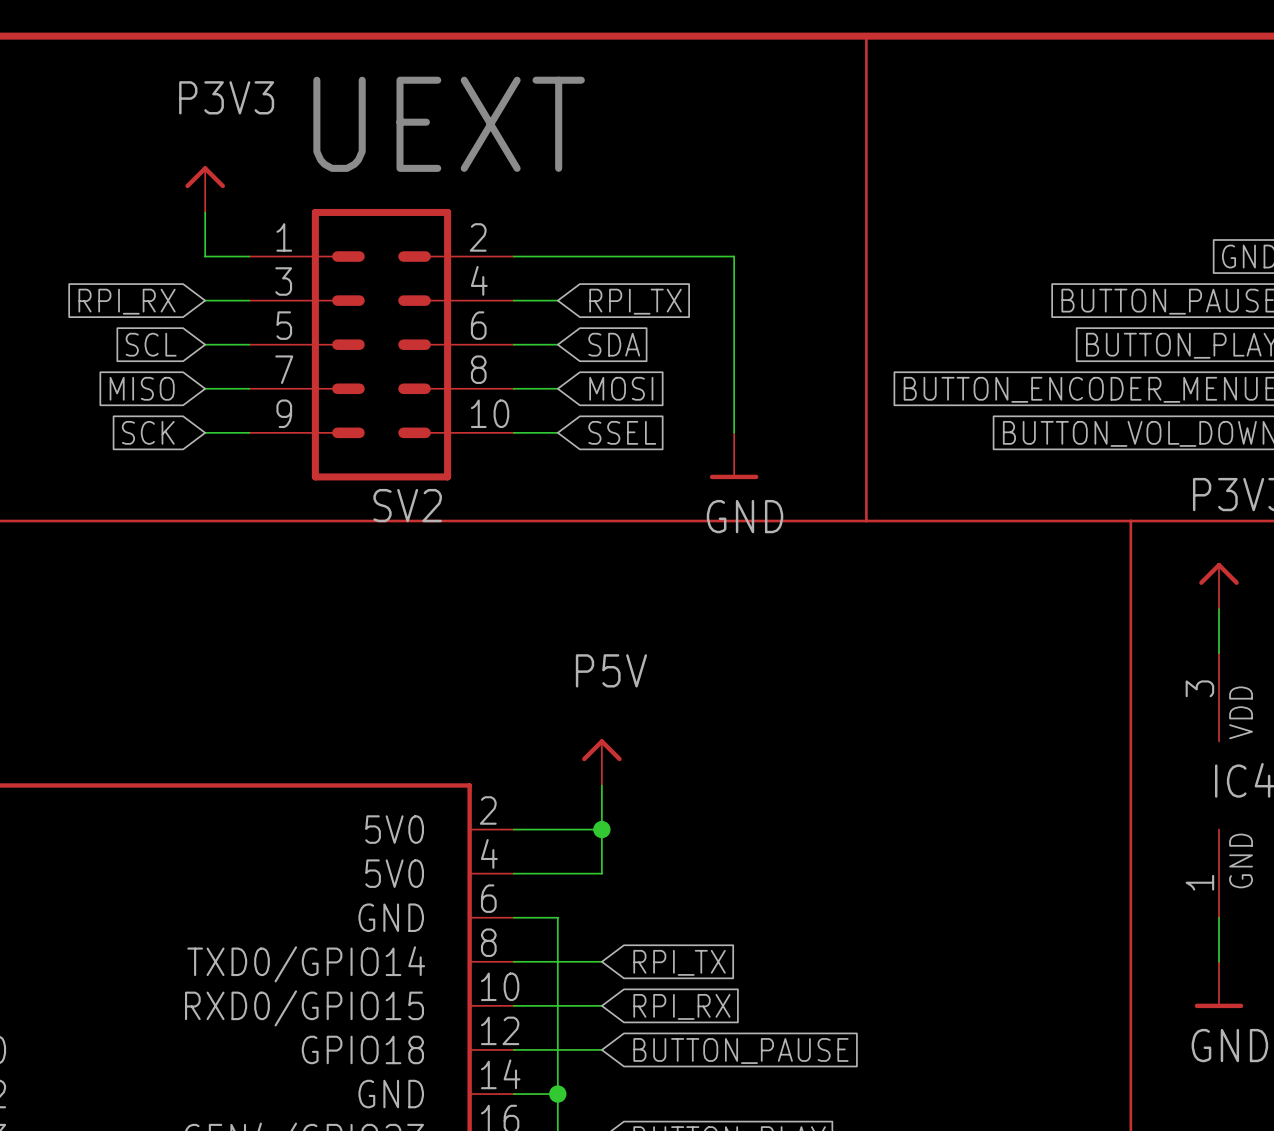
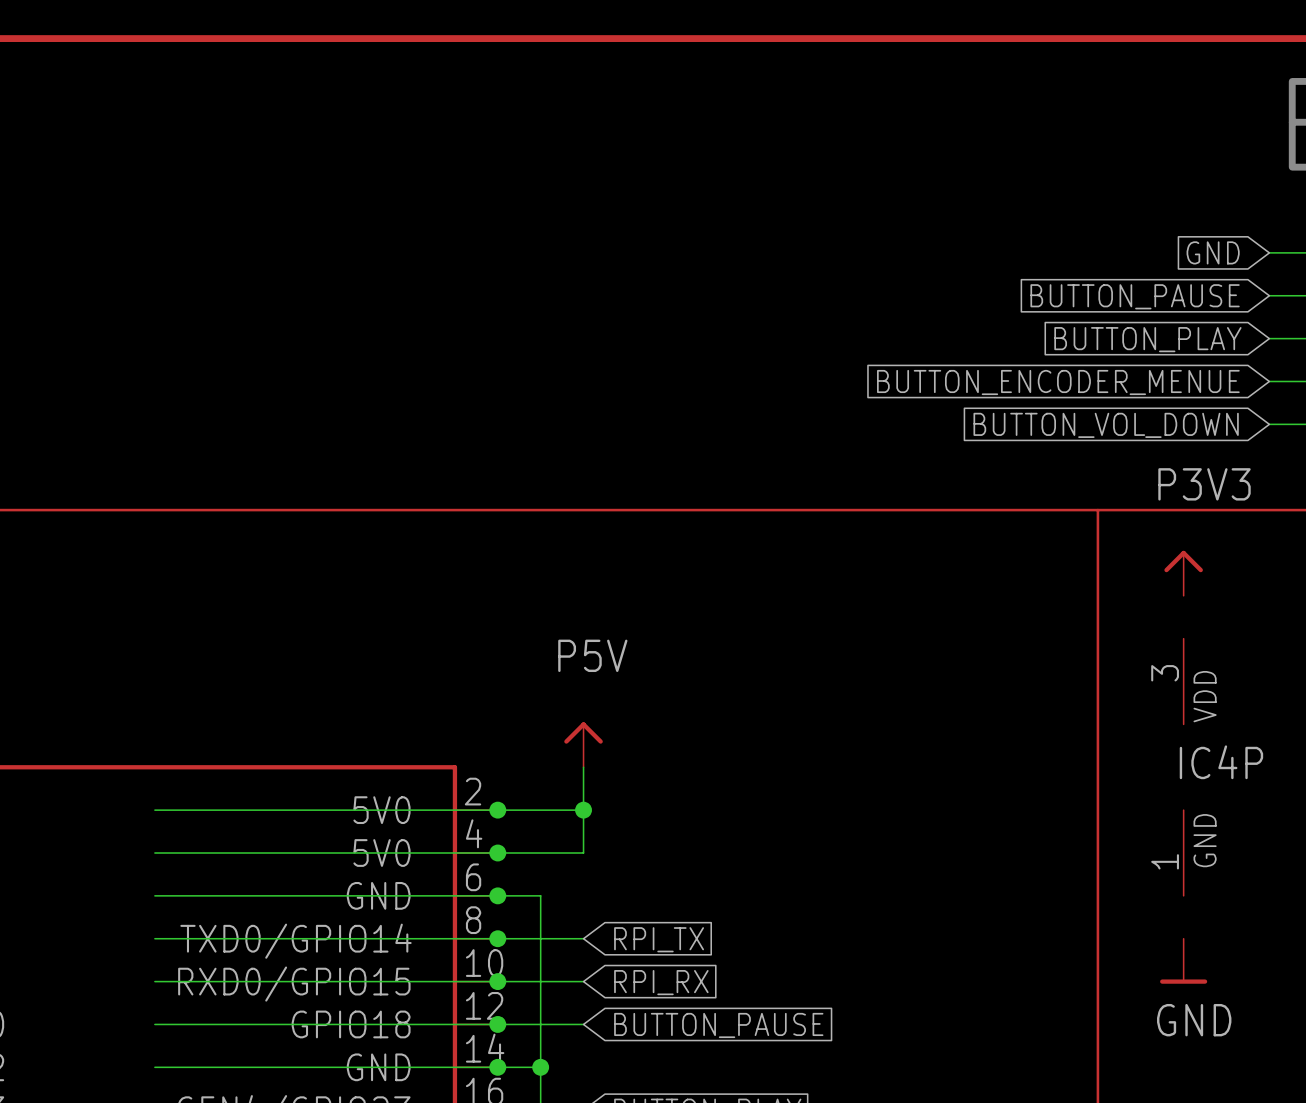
line: (866, 36) (866, 521) -> none
text: UEXT (449, 124) -> none
power symbol: P3V3 (205, 189) -> none
wire: (205, 212) (205, 256) (249, 256) -> none
wire: (513, 256) (734, 256) (734, 432) -> none
wire: (205, 300) (249, 300) -> none
wire: (513, 300) (557, 300) -> none
global label: RPI_RX (127, 301) -> none
global label: RPI_TX (635, 301) -> none
global label: SCL (151, 344) -> none
wire: (205, 344) (249, 344) -> none
SV2: (381, 344) -> none
wire: (513, 344) (557, 344) -> none
global label: SDA (614, 344) -> none
global label: MISO (142, 388) -> none
wire: (205, 388) (249, 388) -> none
wire: (513, 388) (557, 388) -> none
global label: MOSI (621, 388) -> none
global label: SCK (148, 432) -> none
wire: (205, 432) (249, 432) -> none
wire: (513, 432) (557, 432) -> none
global label: SSEL (622, 432) -> none
power symbol: GND (734, 455) -> none
wire: (1219, 609) (1219, 653) -> none
wire: none -> (154, 810) (497, 810)
junction: none -> (497, 810)
wire: none -> (154, 853) (497, 853)
junction: none -> (497, 853)
wire: none -> (154, 895) (497, 895)
junction: none -> (497, 895)
wire: (1219, 917) (1219, 961) -> none
wire: none -> (154, 938) (497, 938)
junction: none -> (497, 938)
wire: none -> (154, 981) (497, 981)
junction: none -> (497, 981)
wire: none -> (154, 1024) (497, 1024)
junction: none -> (497, 1024)
wire: none -> (154, 1067) (497, 1067)
junction: none -> (497, 1067)

